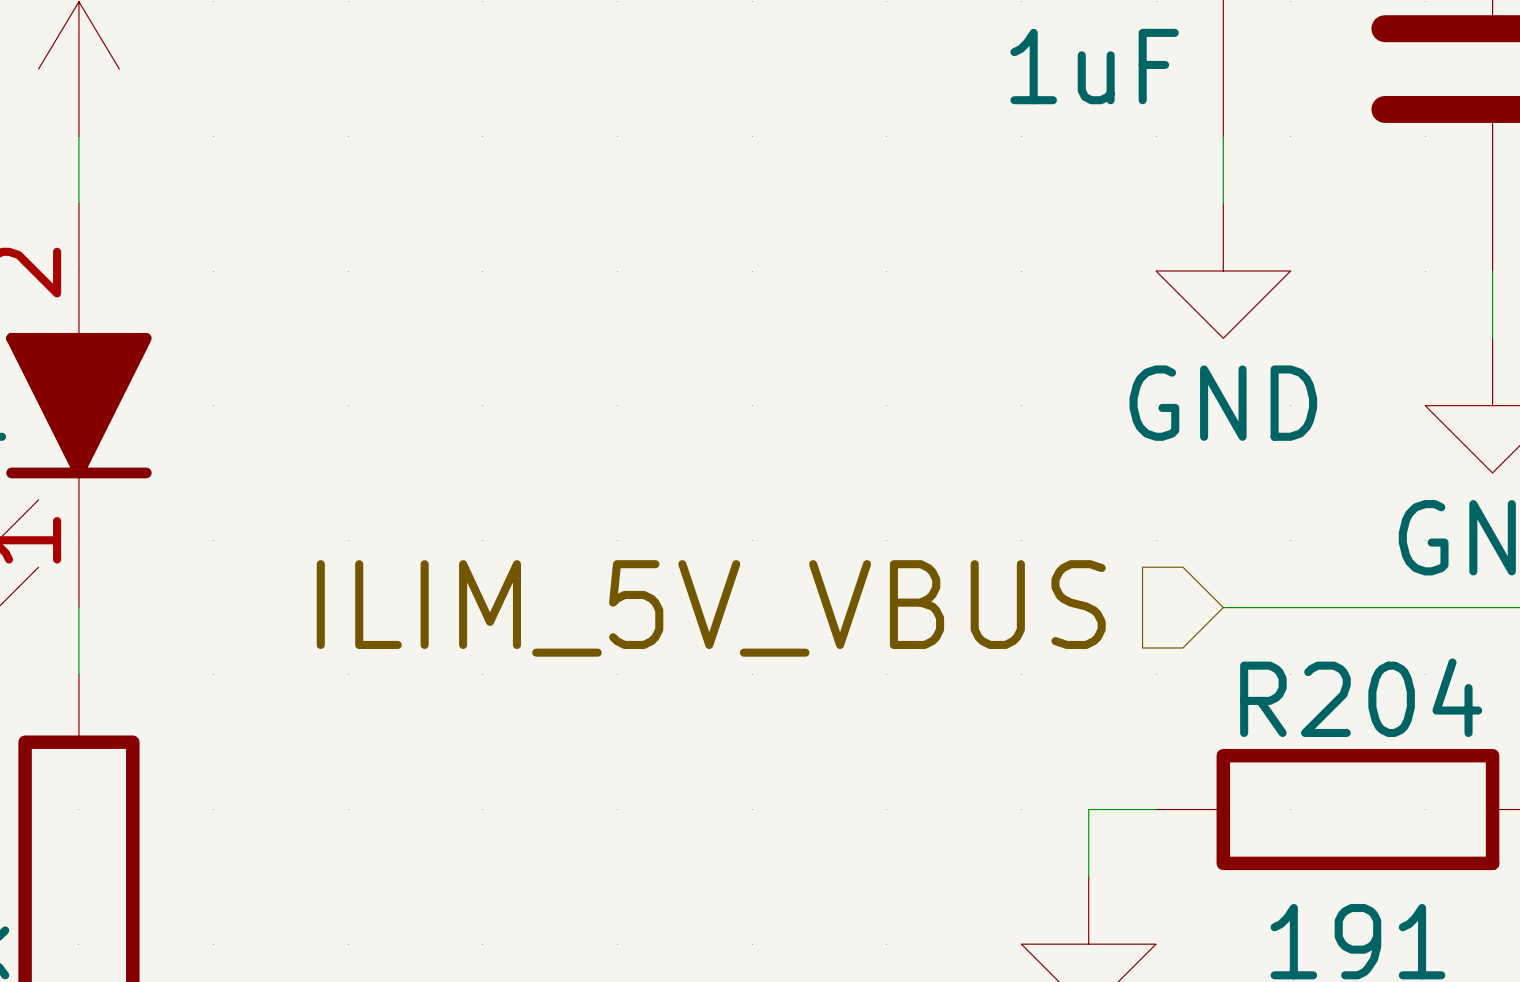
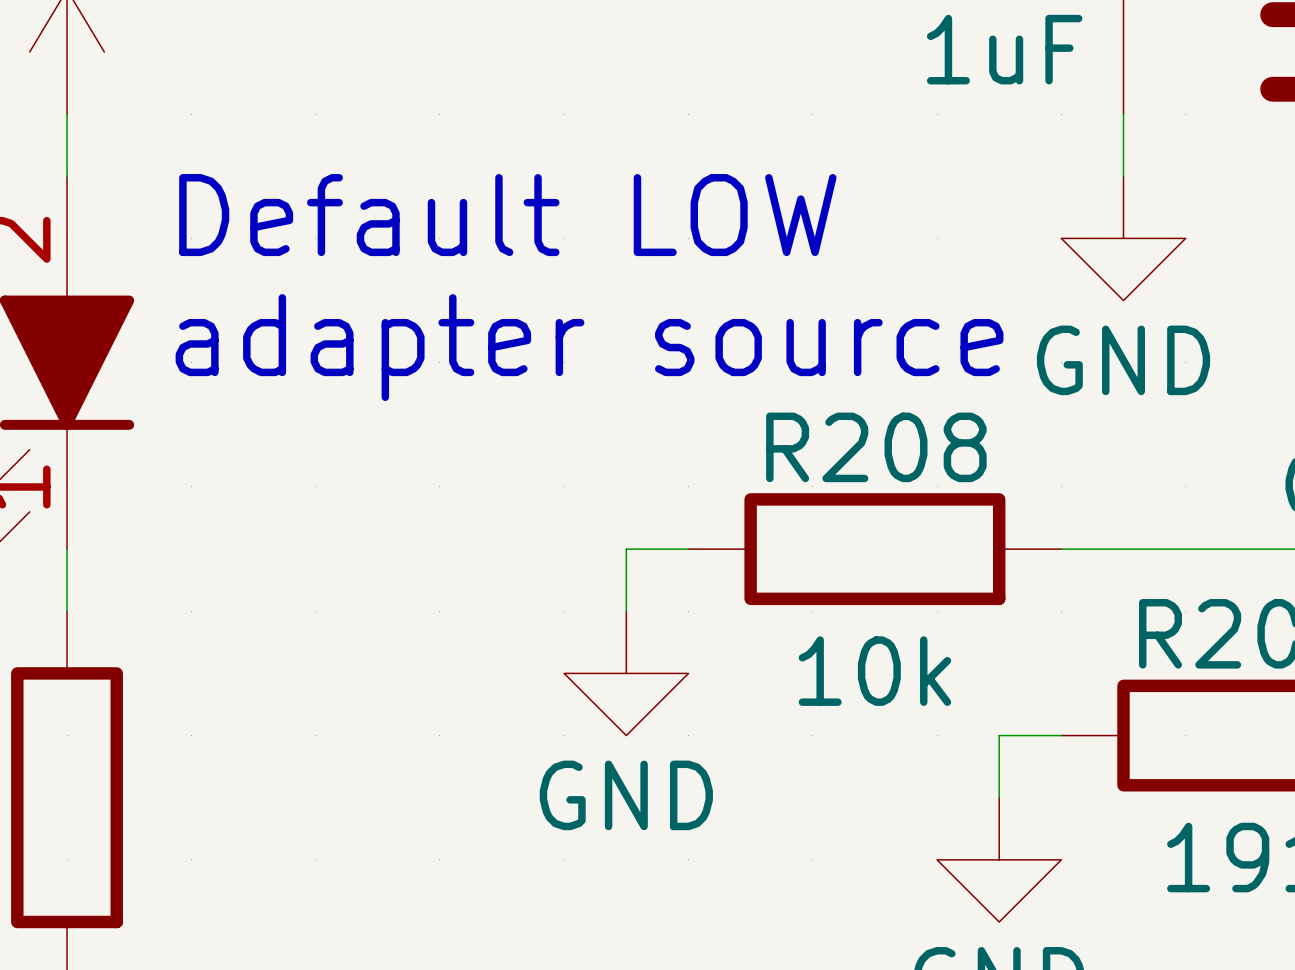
text: none -> Default LOW (507, 215)
text: none -> adapter source (589, 347)
wire: none -> (688, 549) (626, 549) (626, 611)
R208: none -> 10k (874, 549)
wire: none -> (1061, 549) (1123, 549)
hierarchical label: ILIM_5V_VBUS (711, 608) -> none
power symbol: none -> GND (626, 673)

